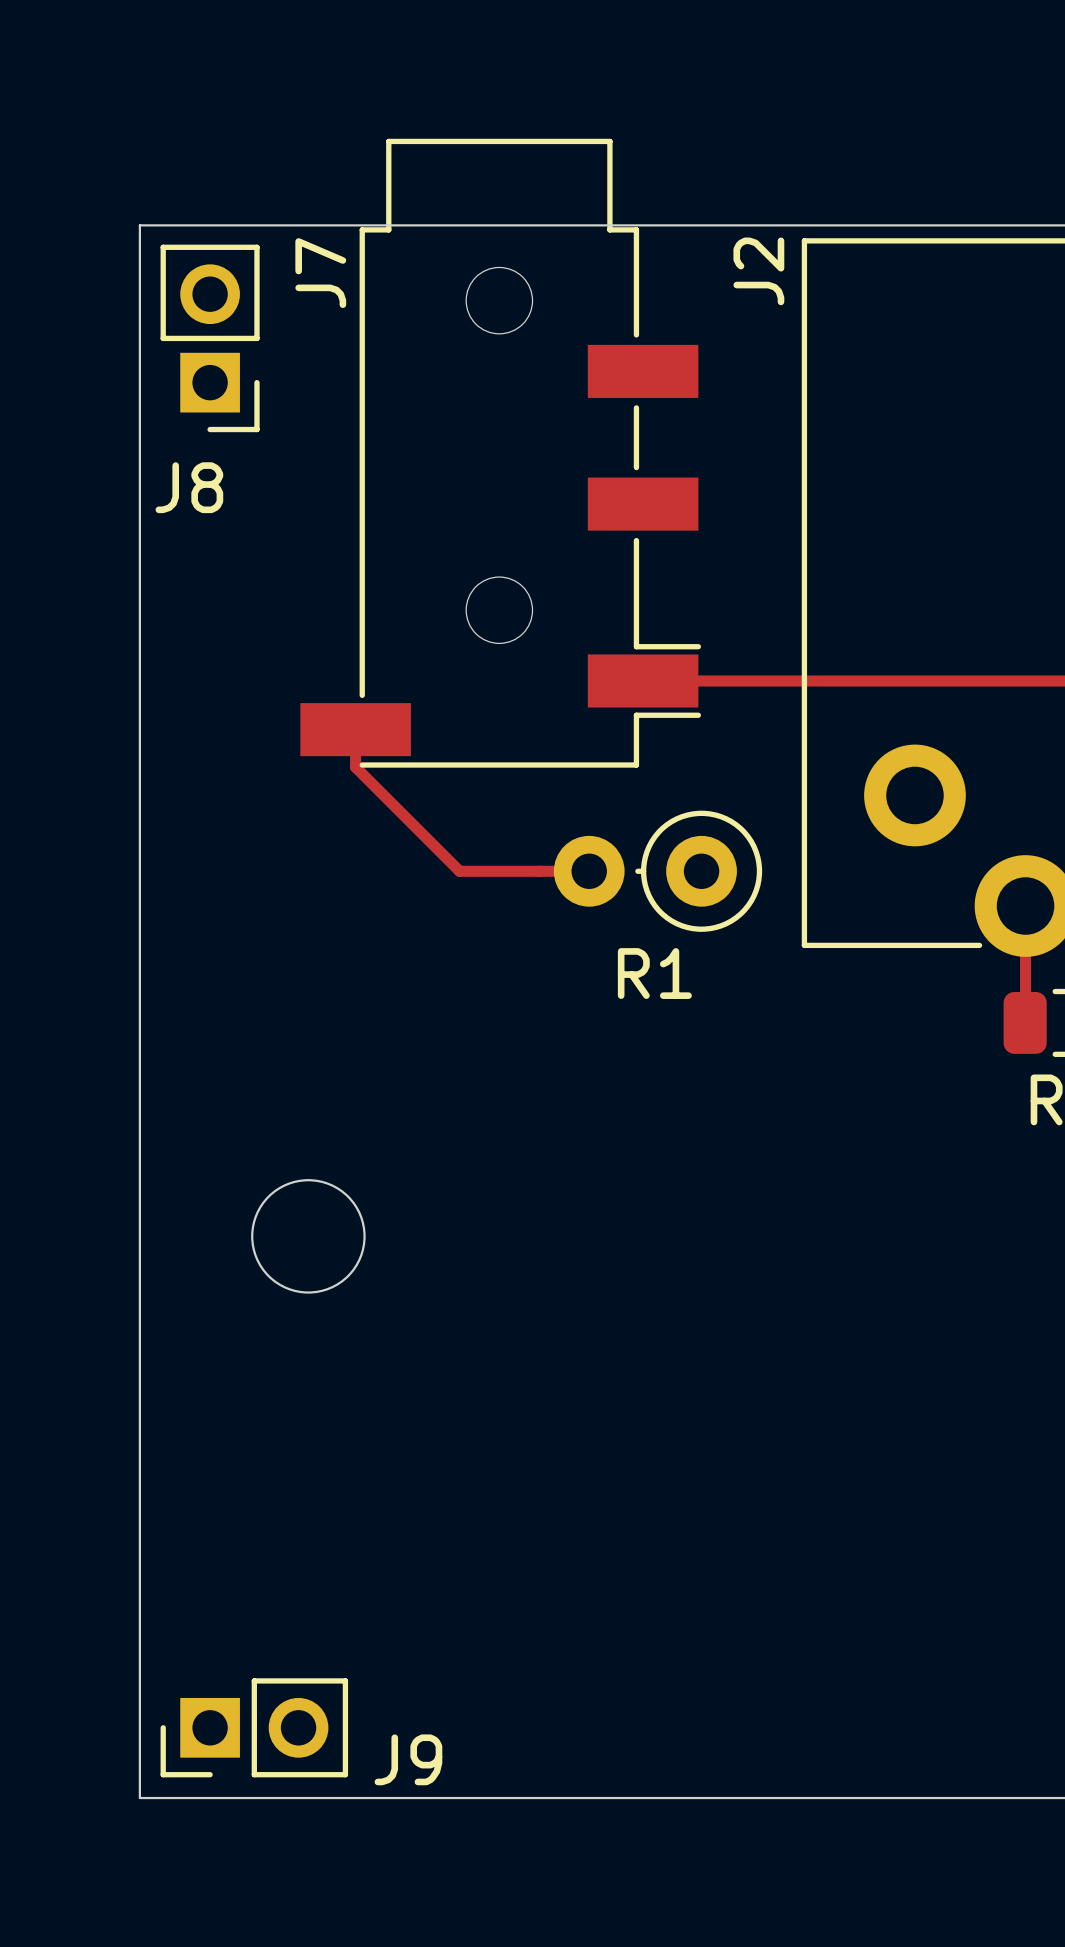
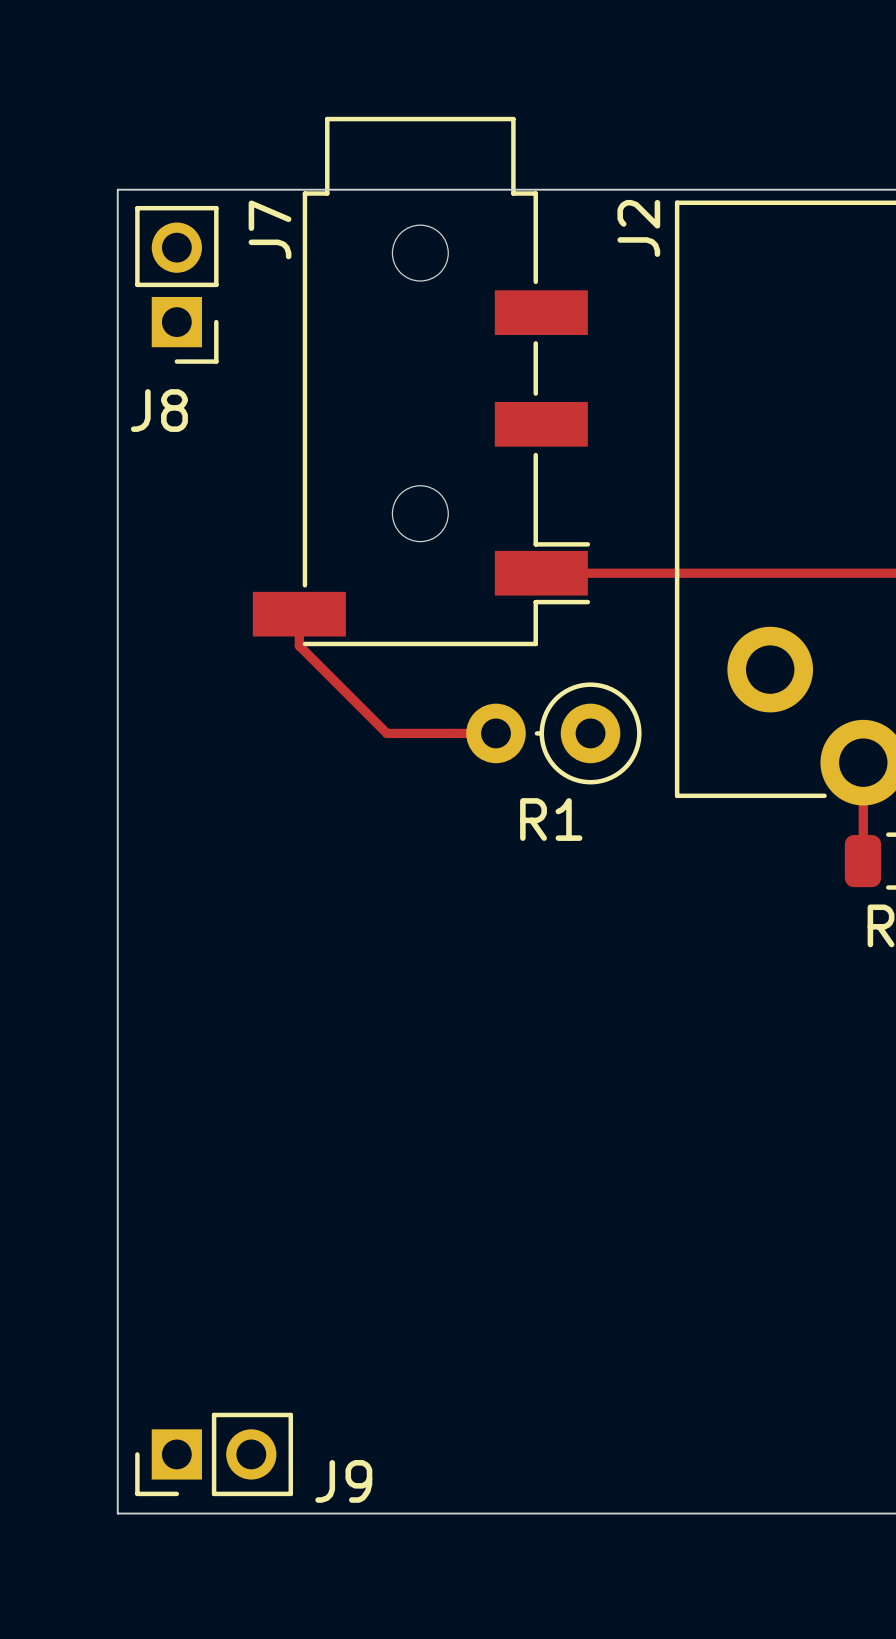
round board edge: [251, 1179, 366, 1294] -> none

